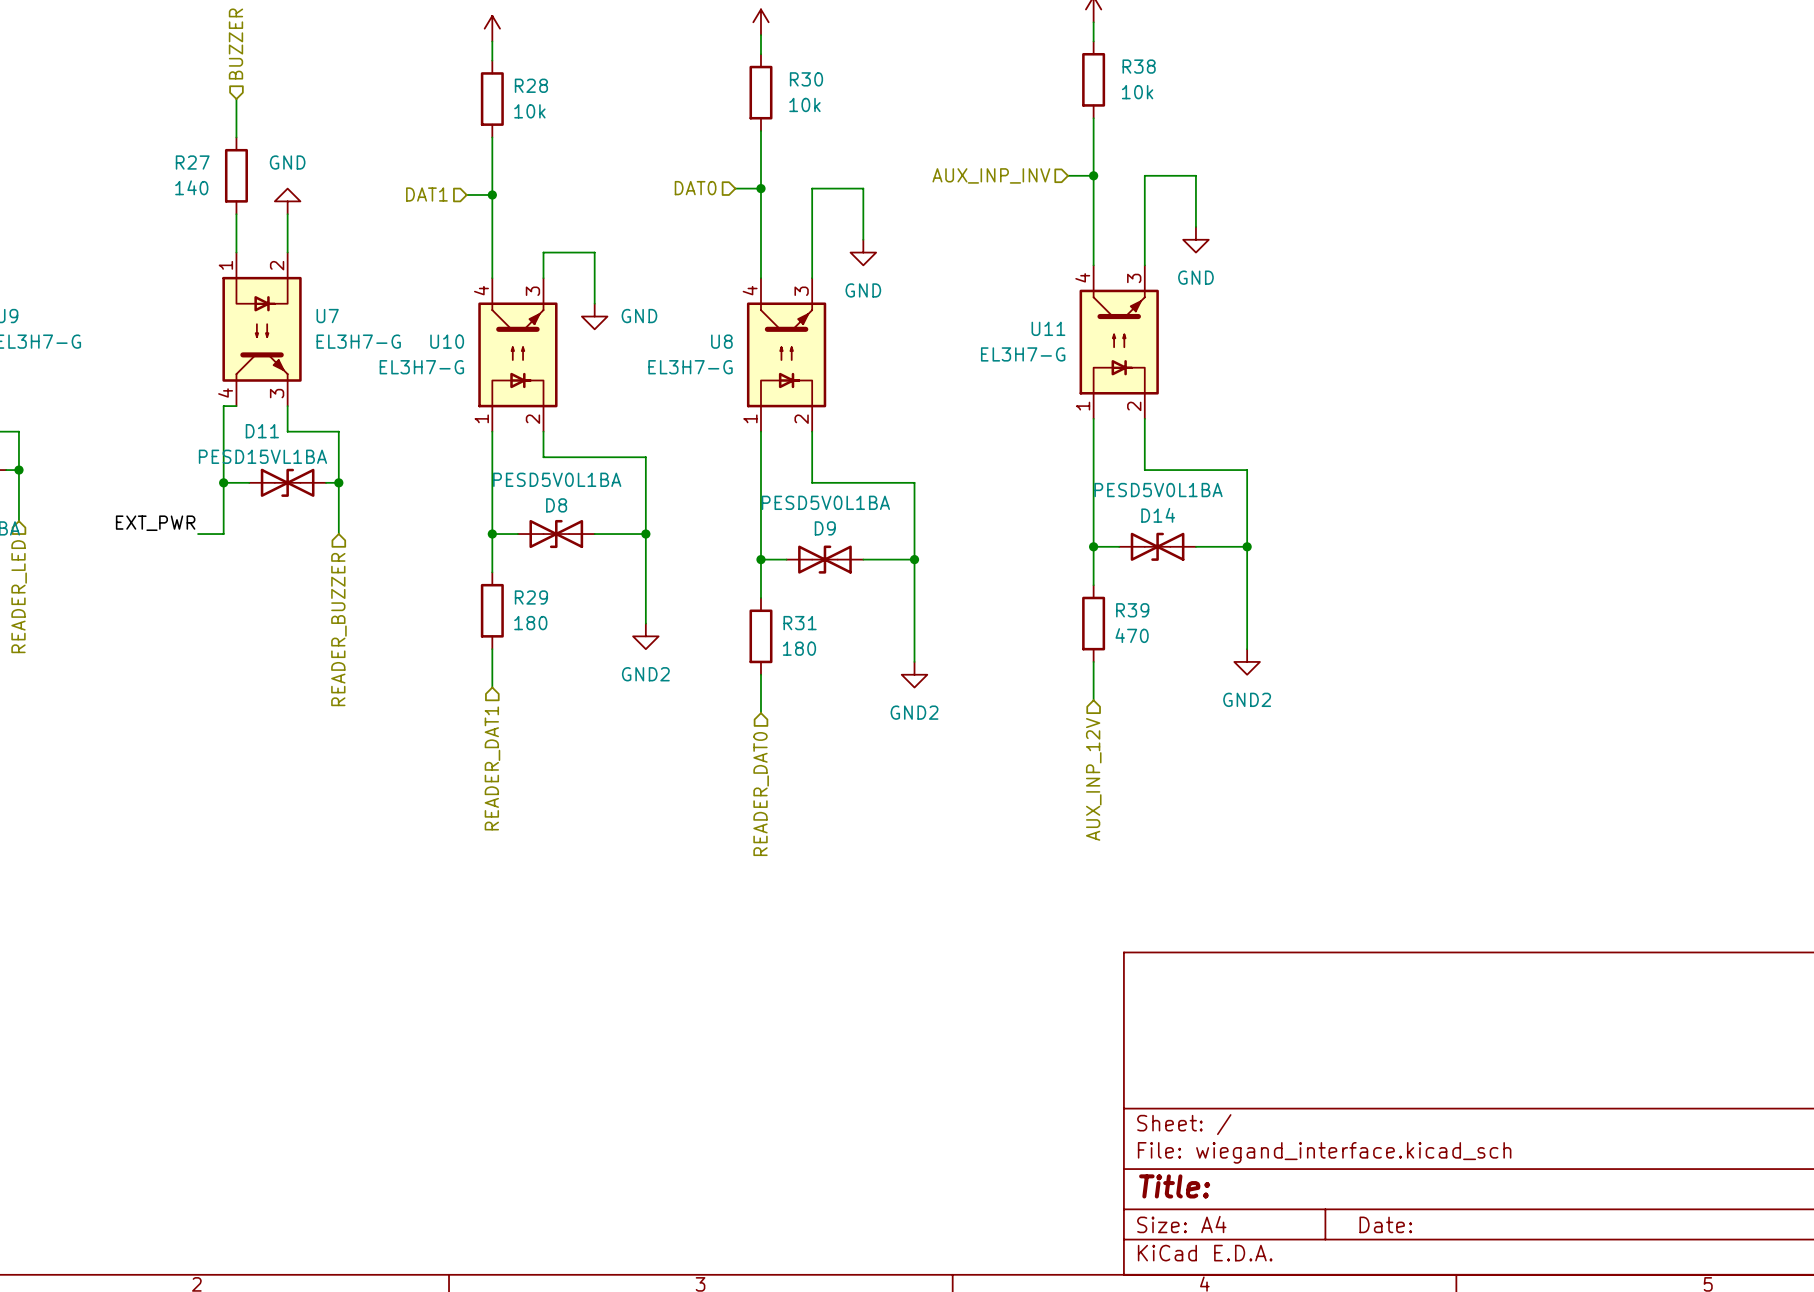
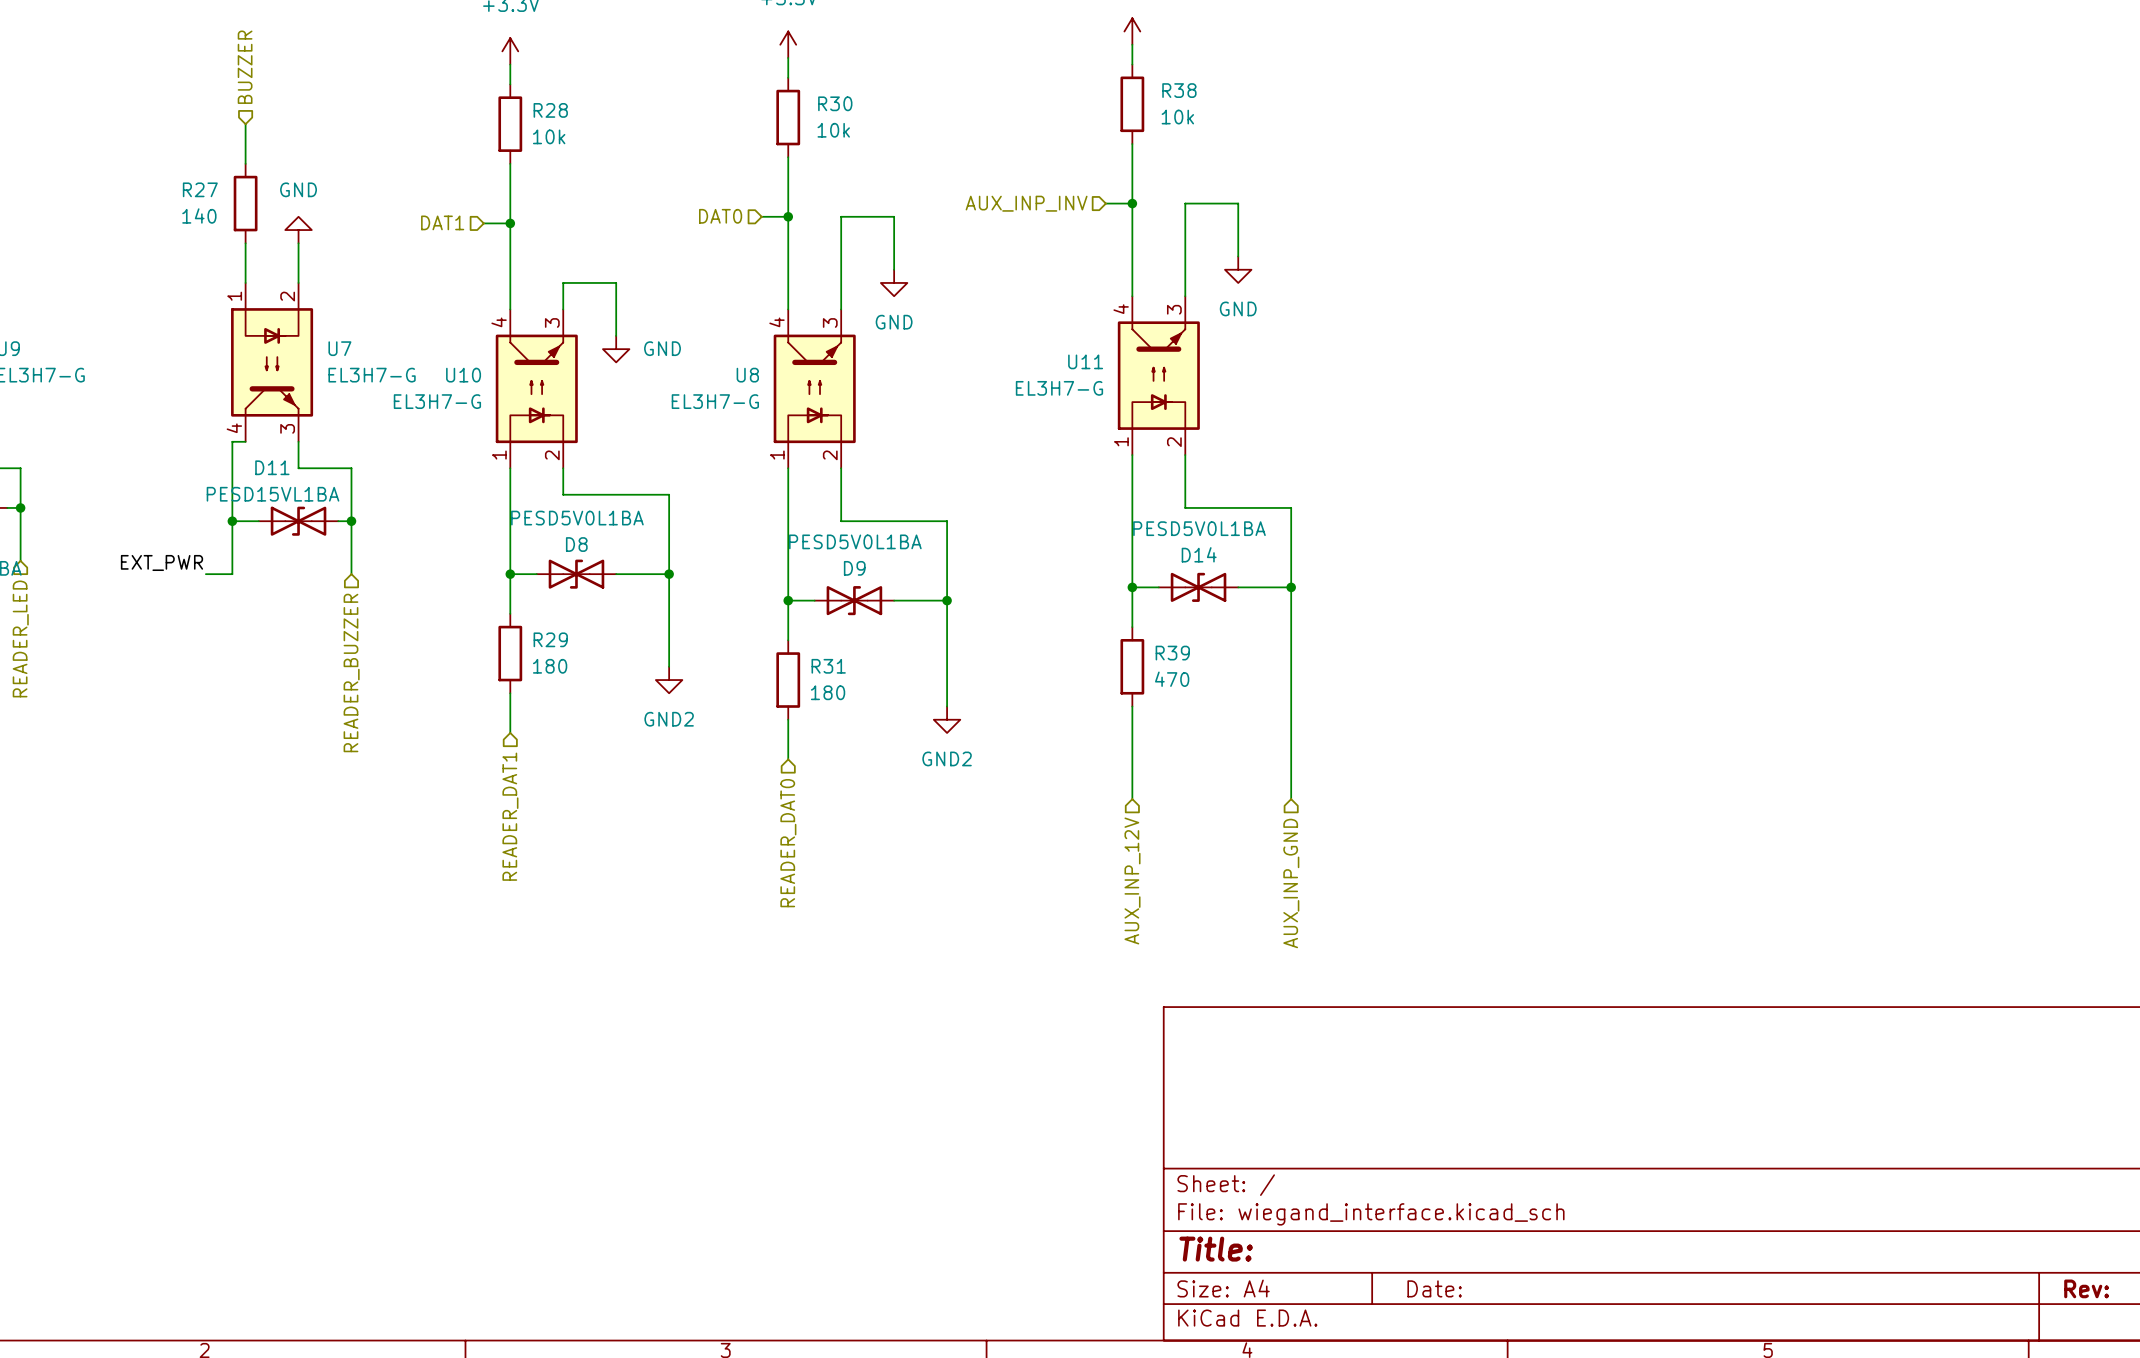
wire: none -> (1291, 693) (1291, 799)
power symbol: GND2 (1247, 661) -> none
wire: none -> (1132, 746) (1132, 799)
hierarchical label position: AUX_INP_12V (1093, 779) -> AUX_INP_12V (1132, 880)
hierarchical label: none -> AUX_INP_GND (1291, 883)

